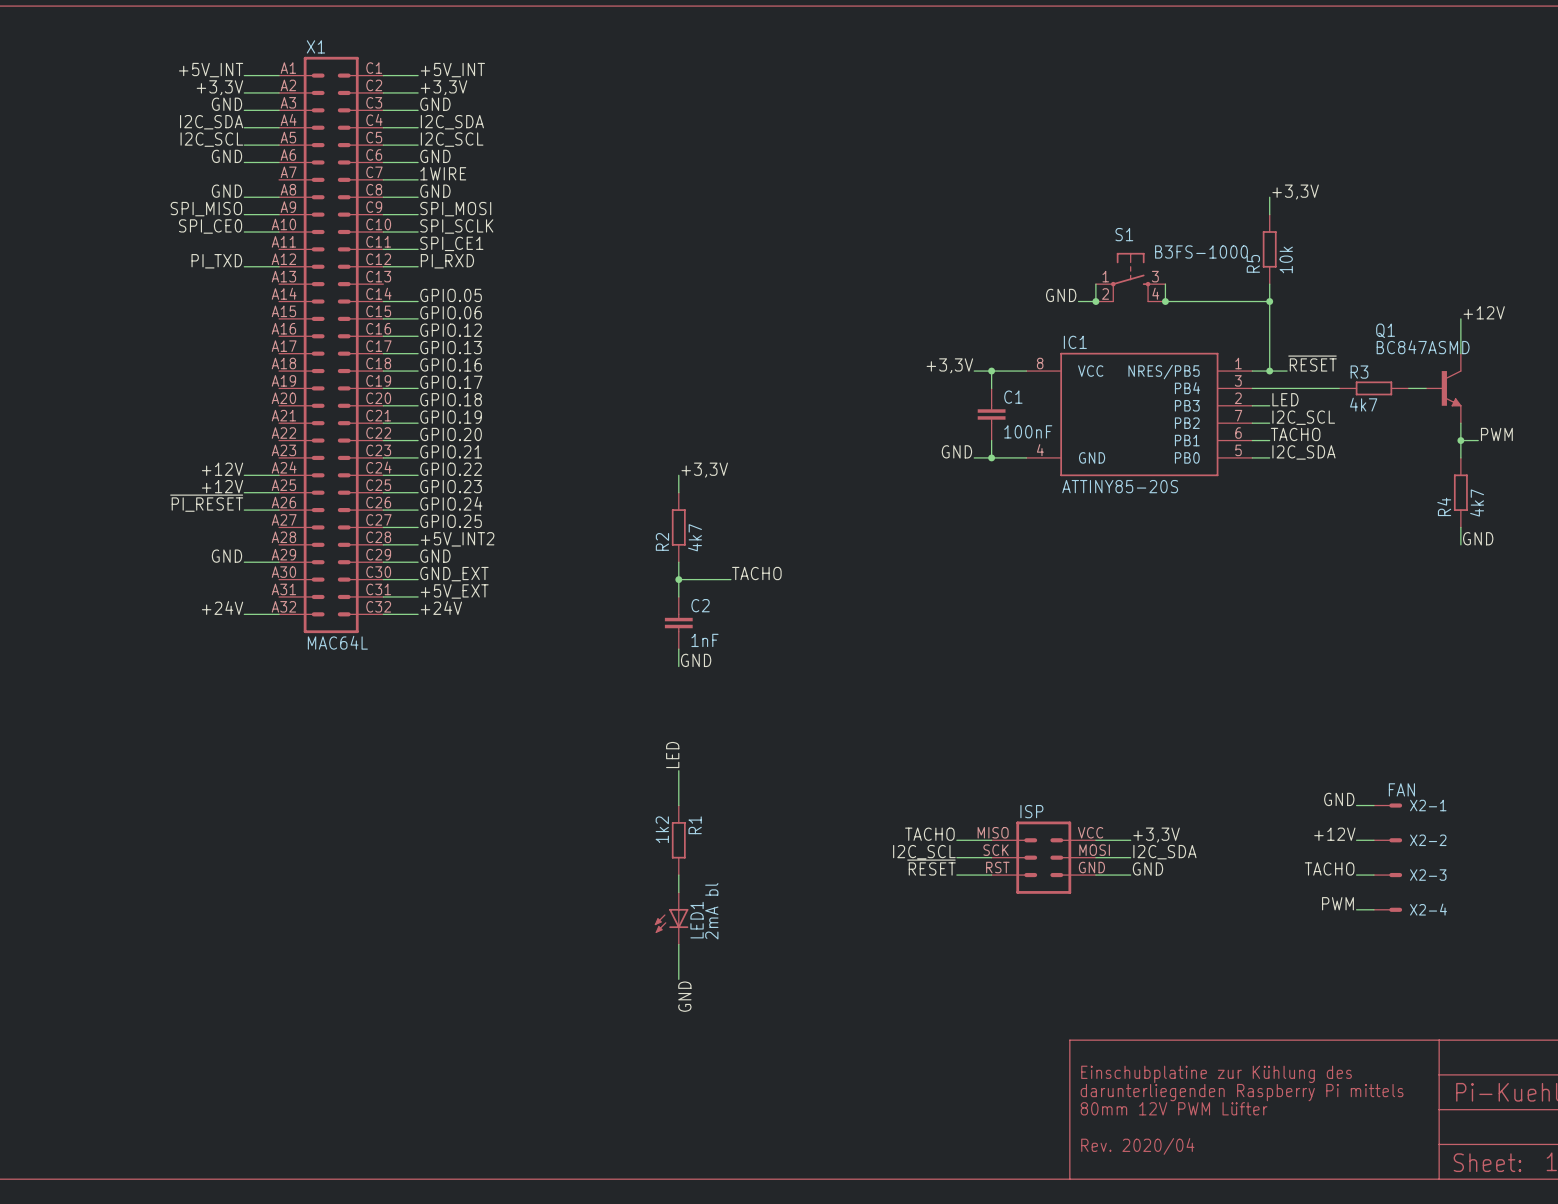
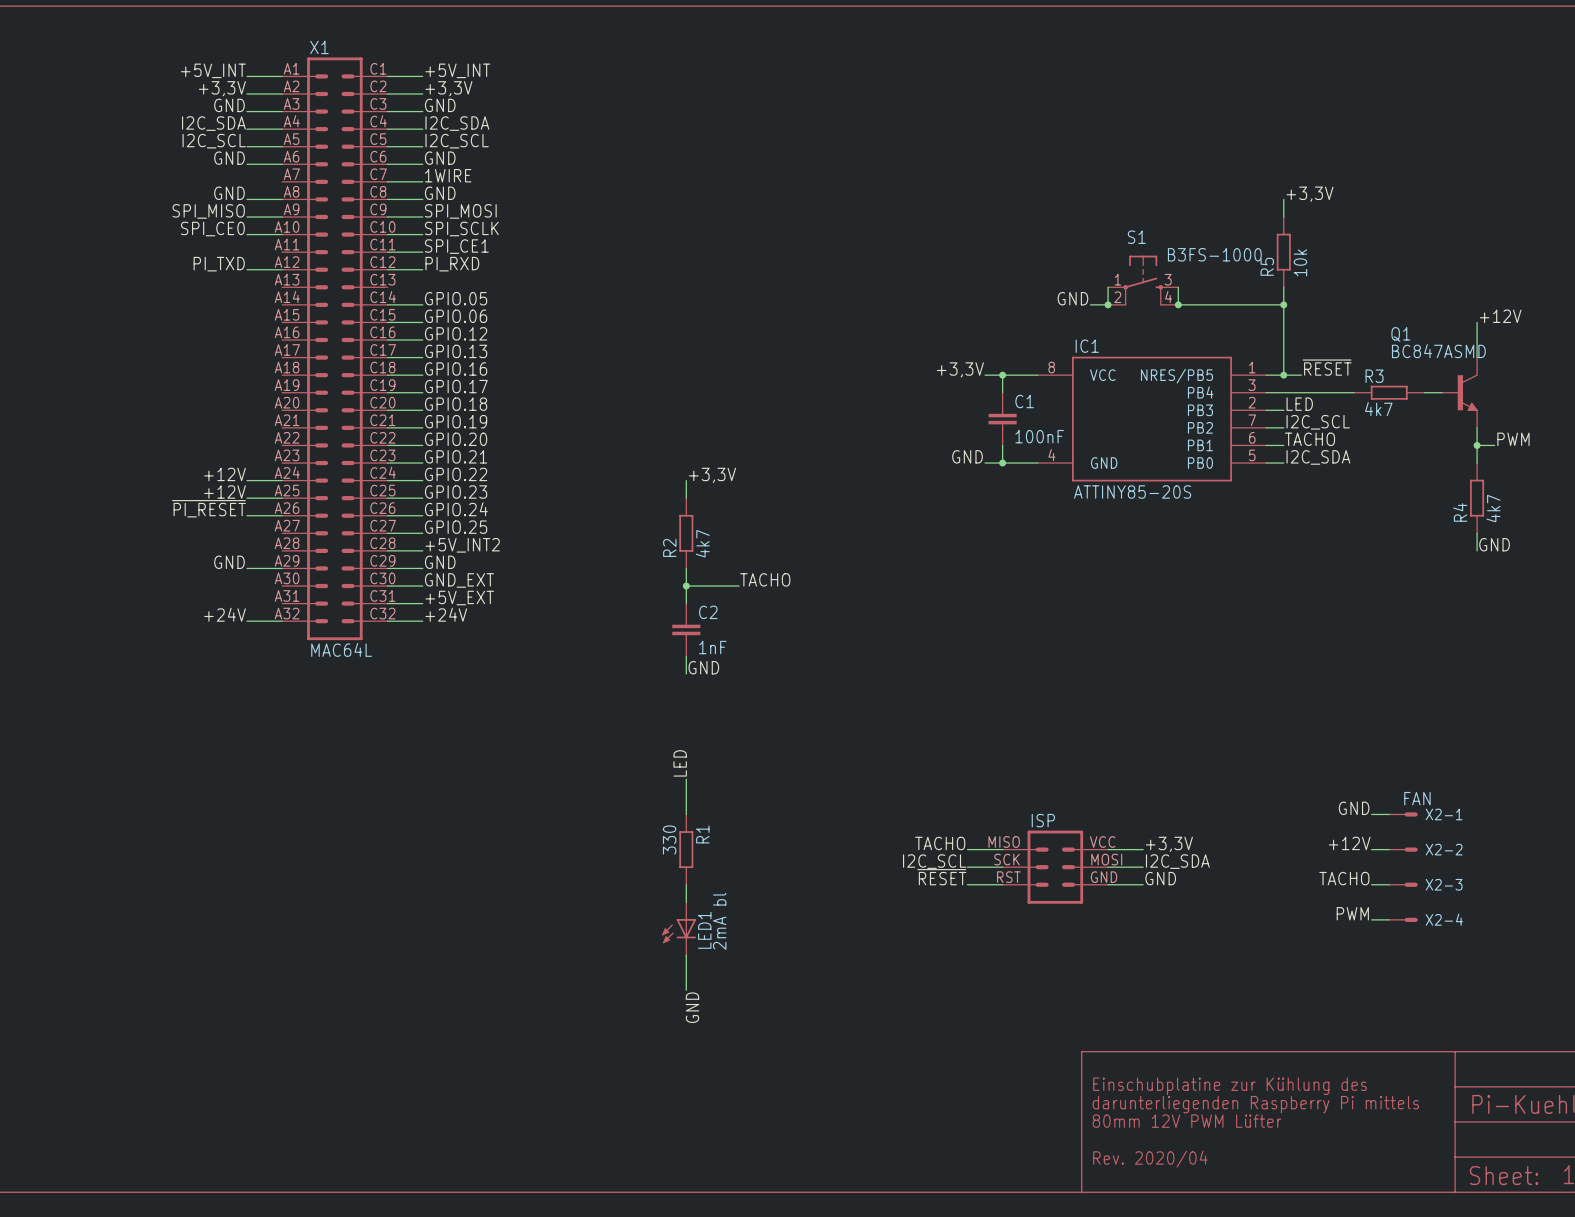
R1 value: 1k2 (662, 829) -> 330 (669, 839)

